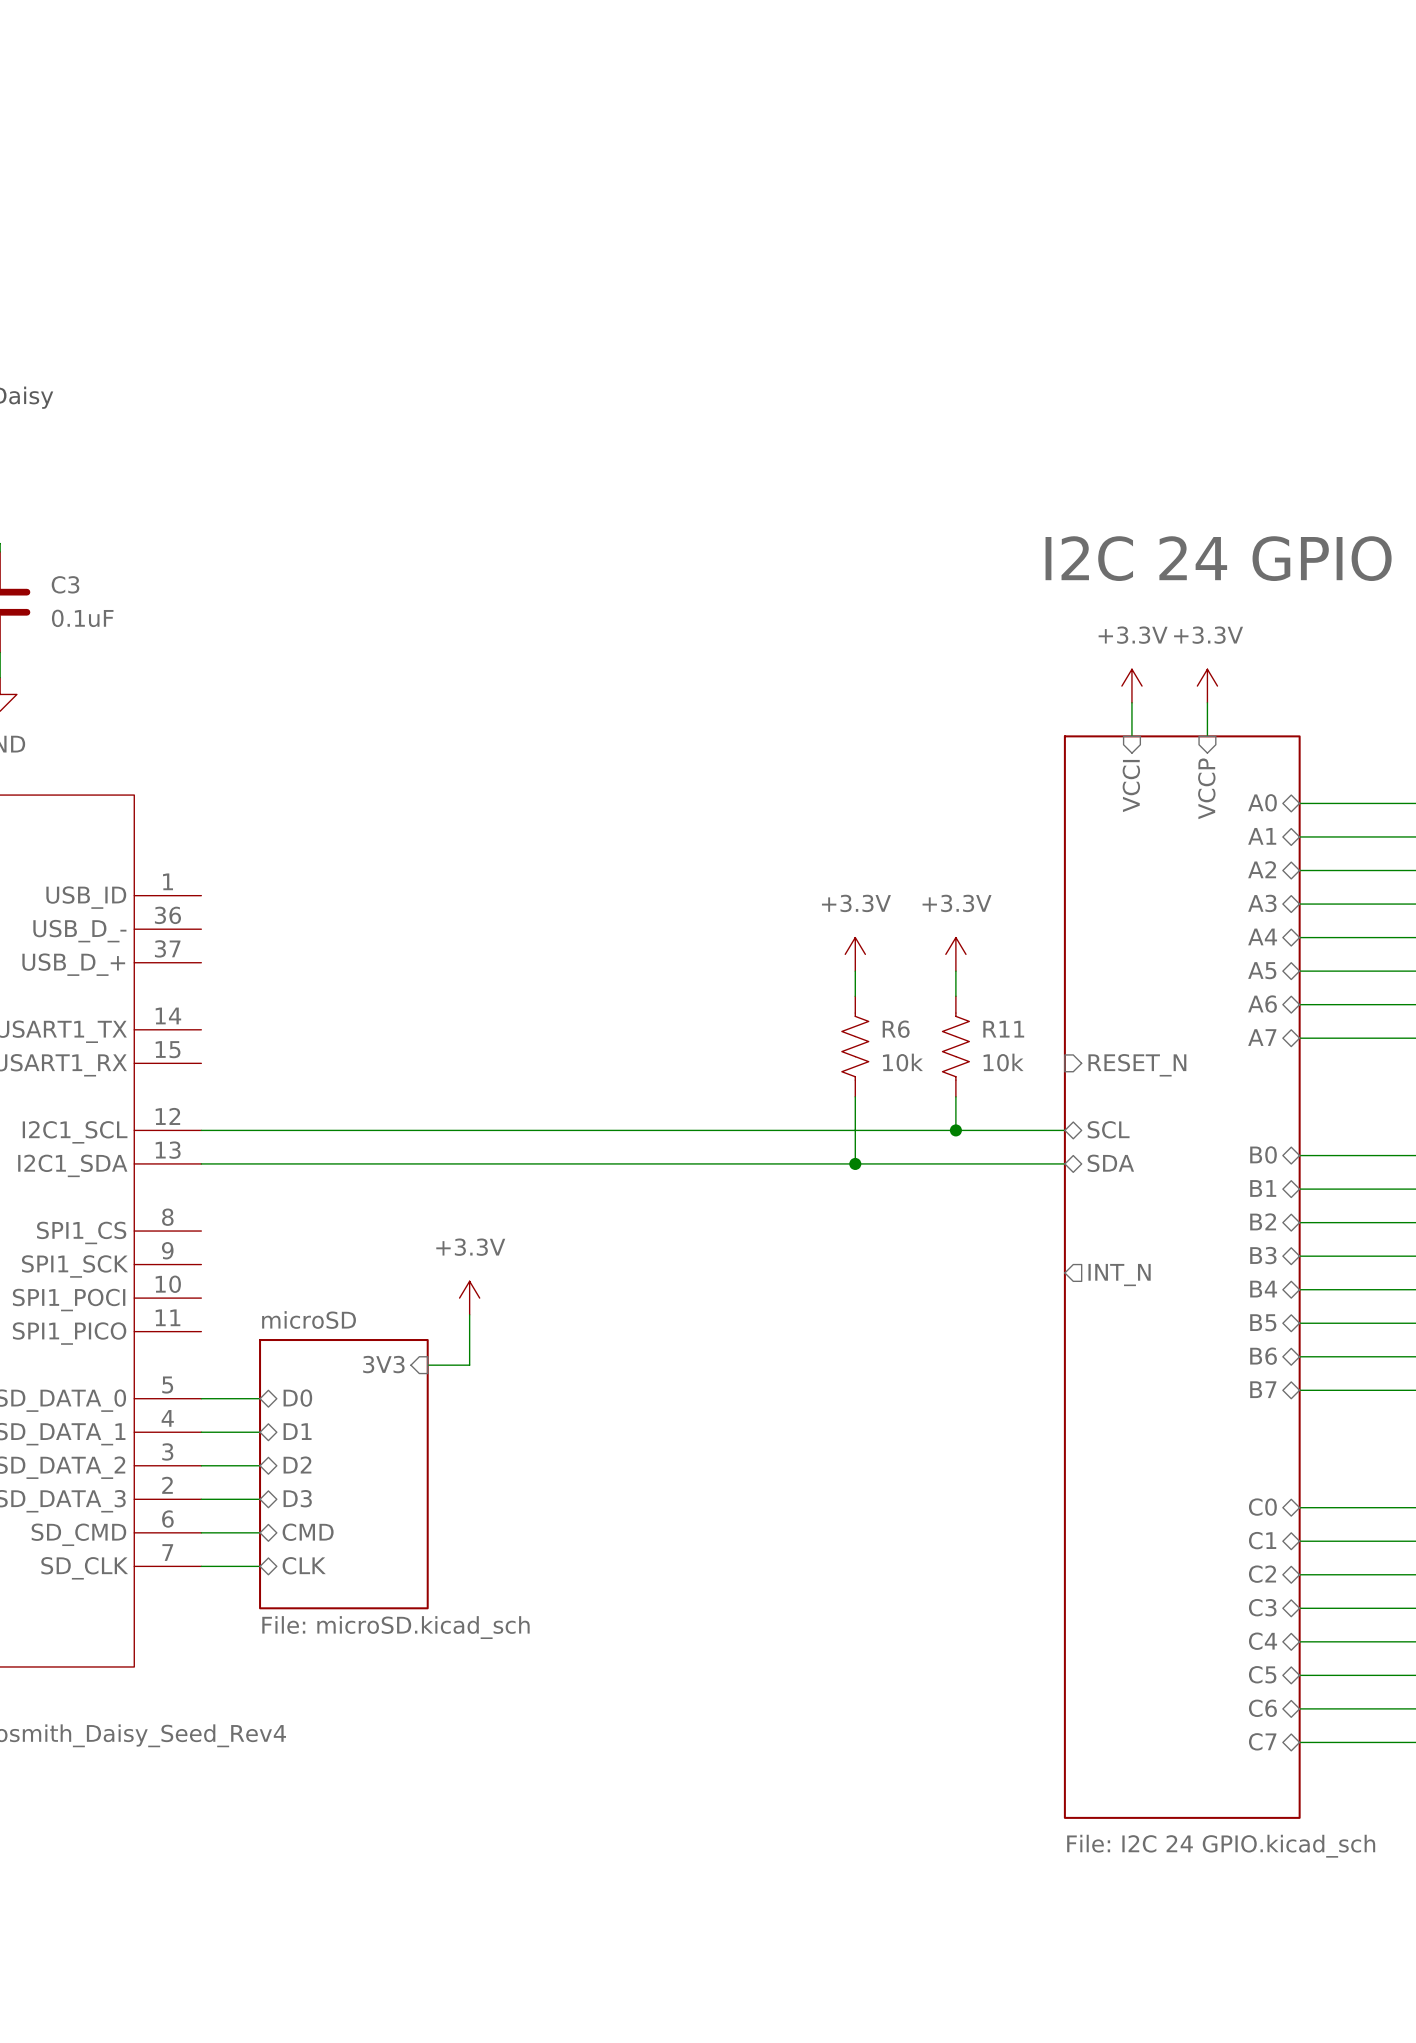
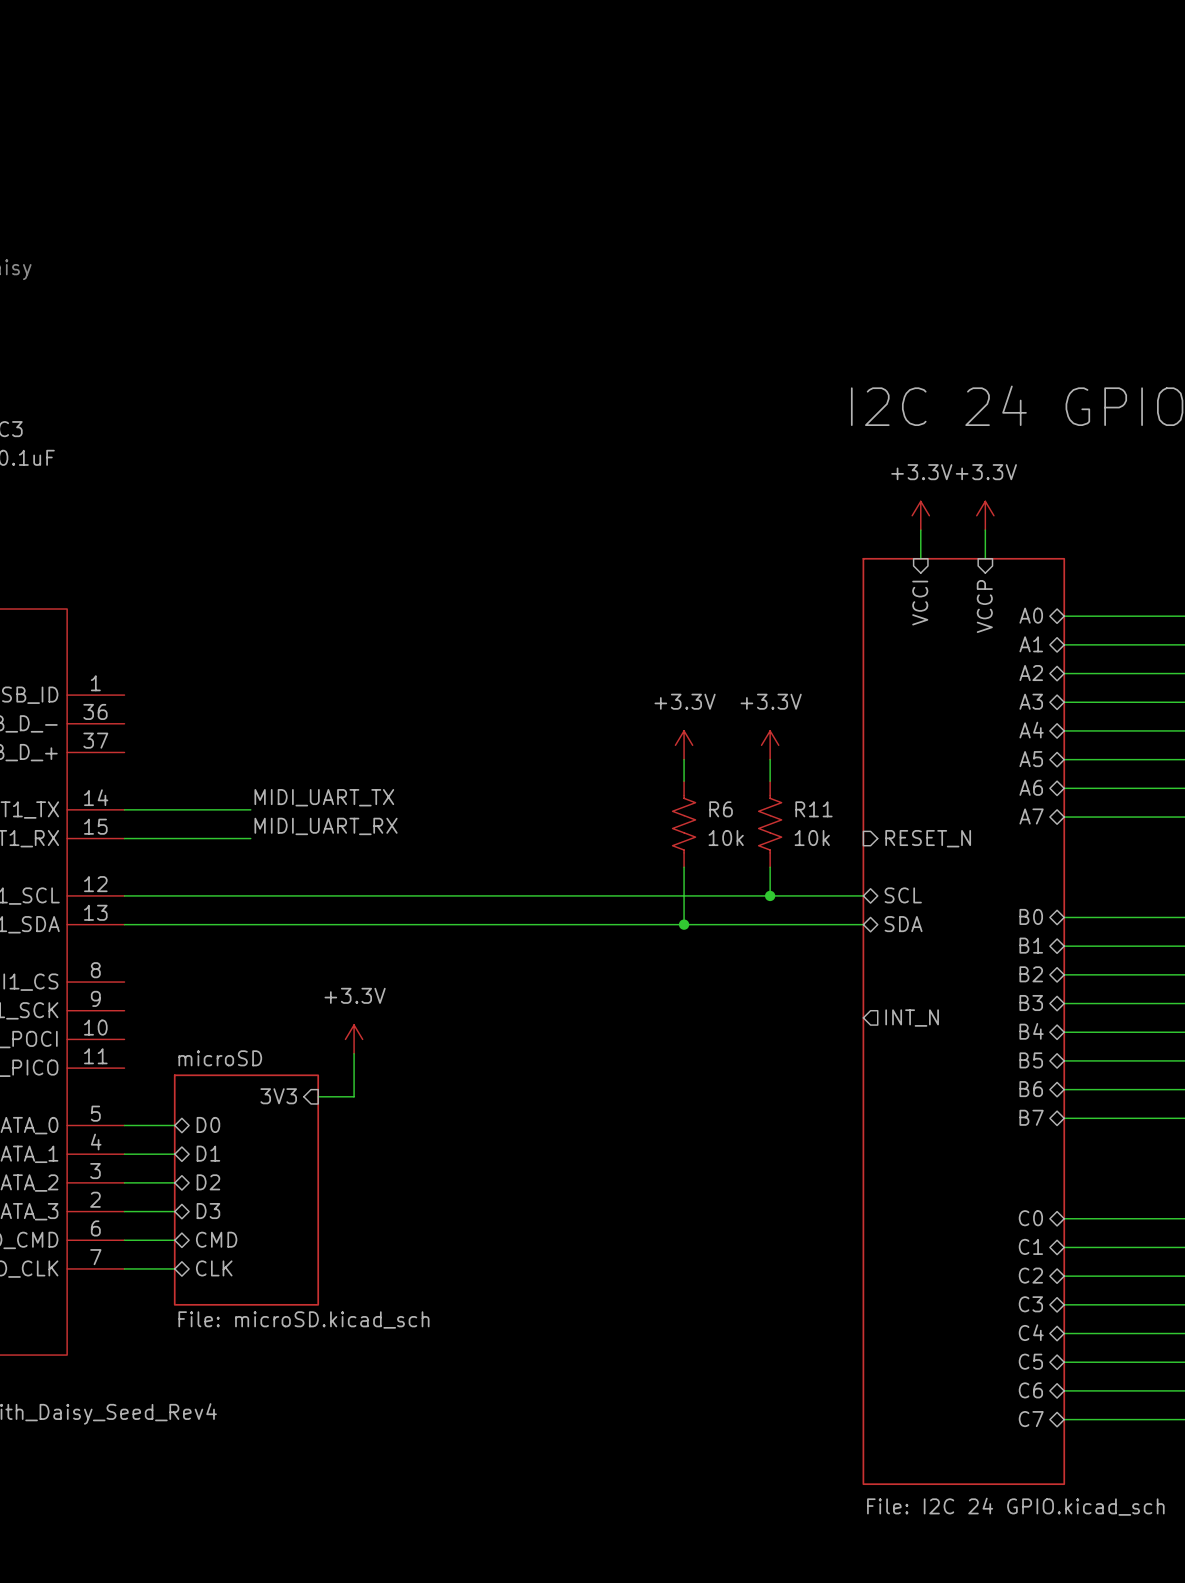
label: none -> MIDI_UART_TX (324, 797)
wire: none -> (124, 809) (250, 809)
label: none -> MIDI_UART_RX (326, 826)
wire: none -> (124, 838) (250, 838)

